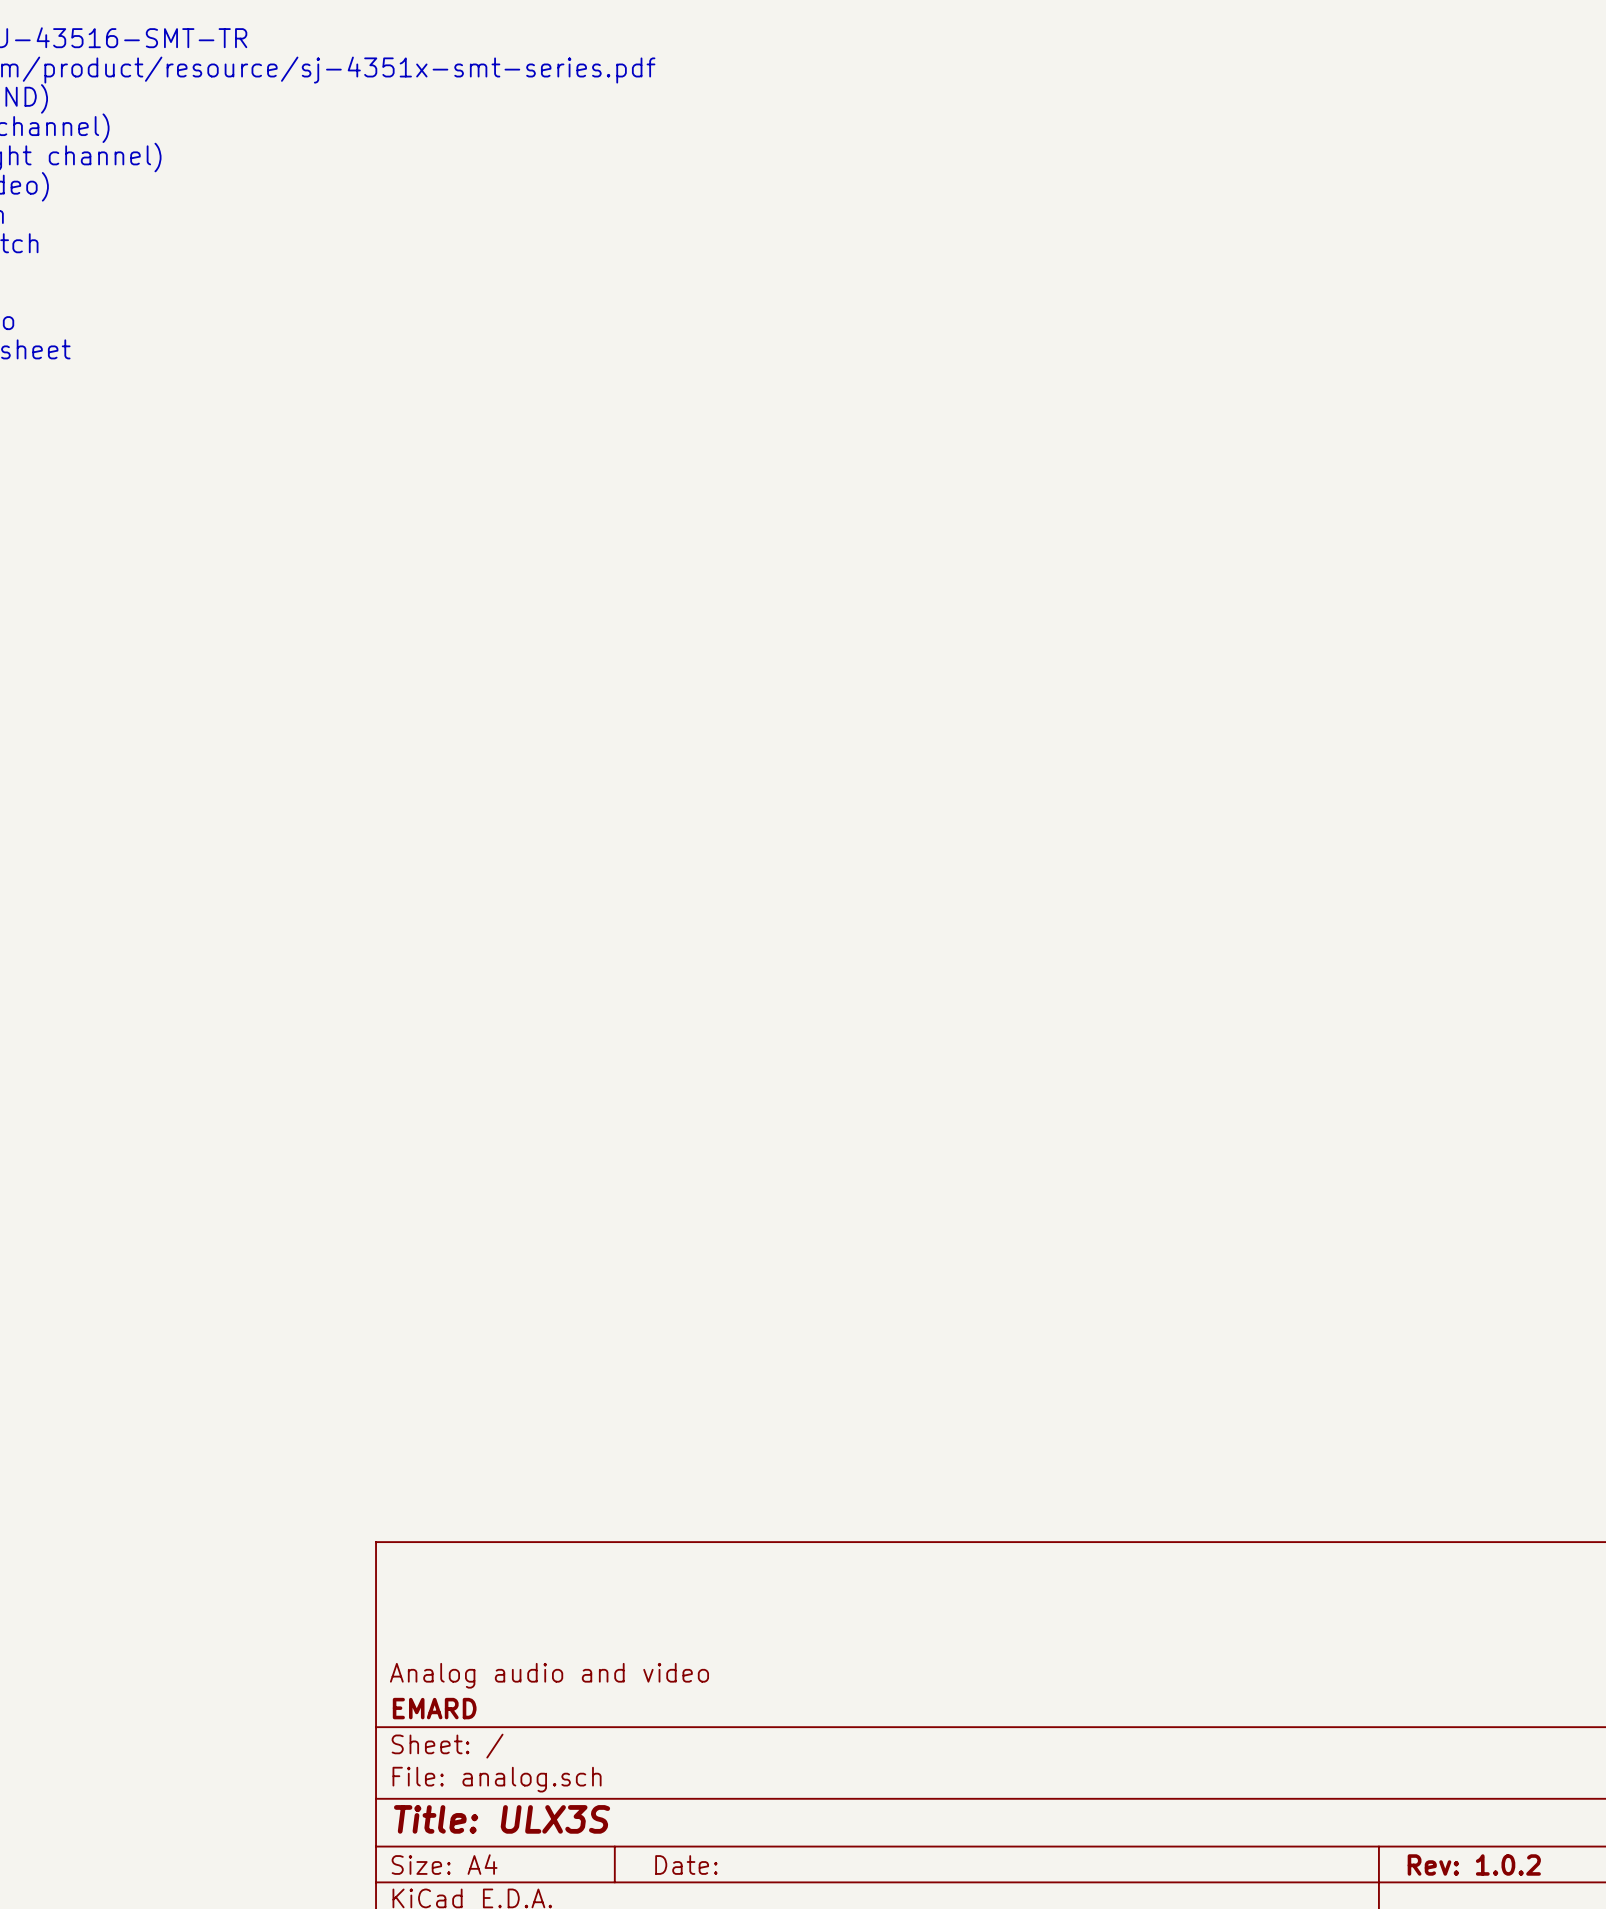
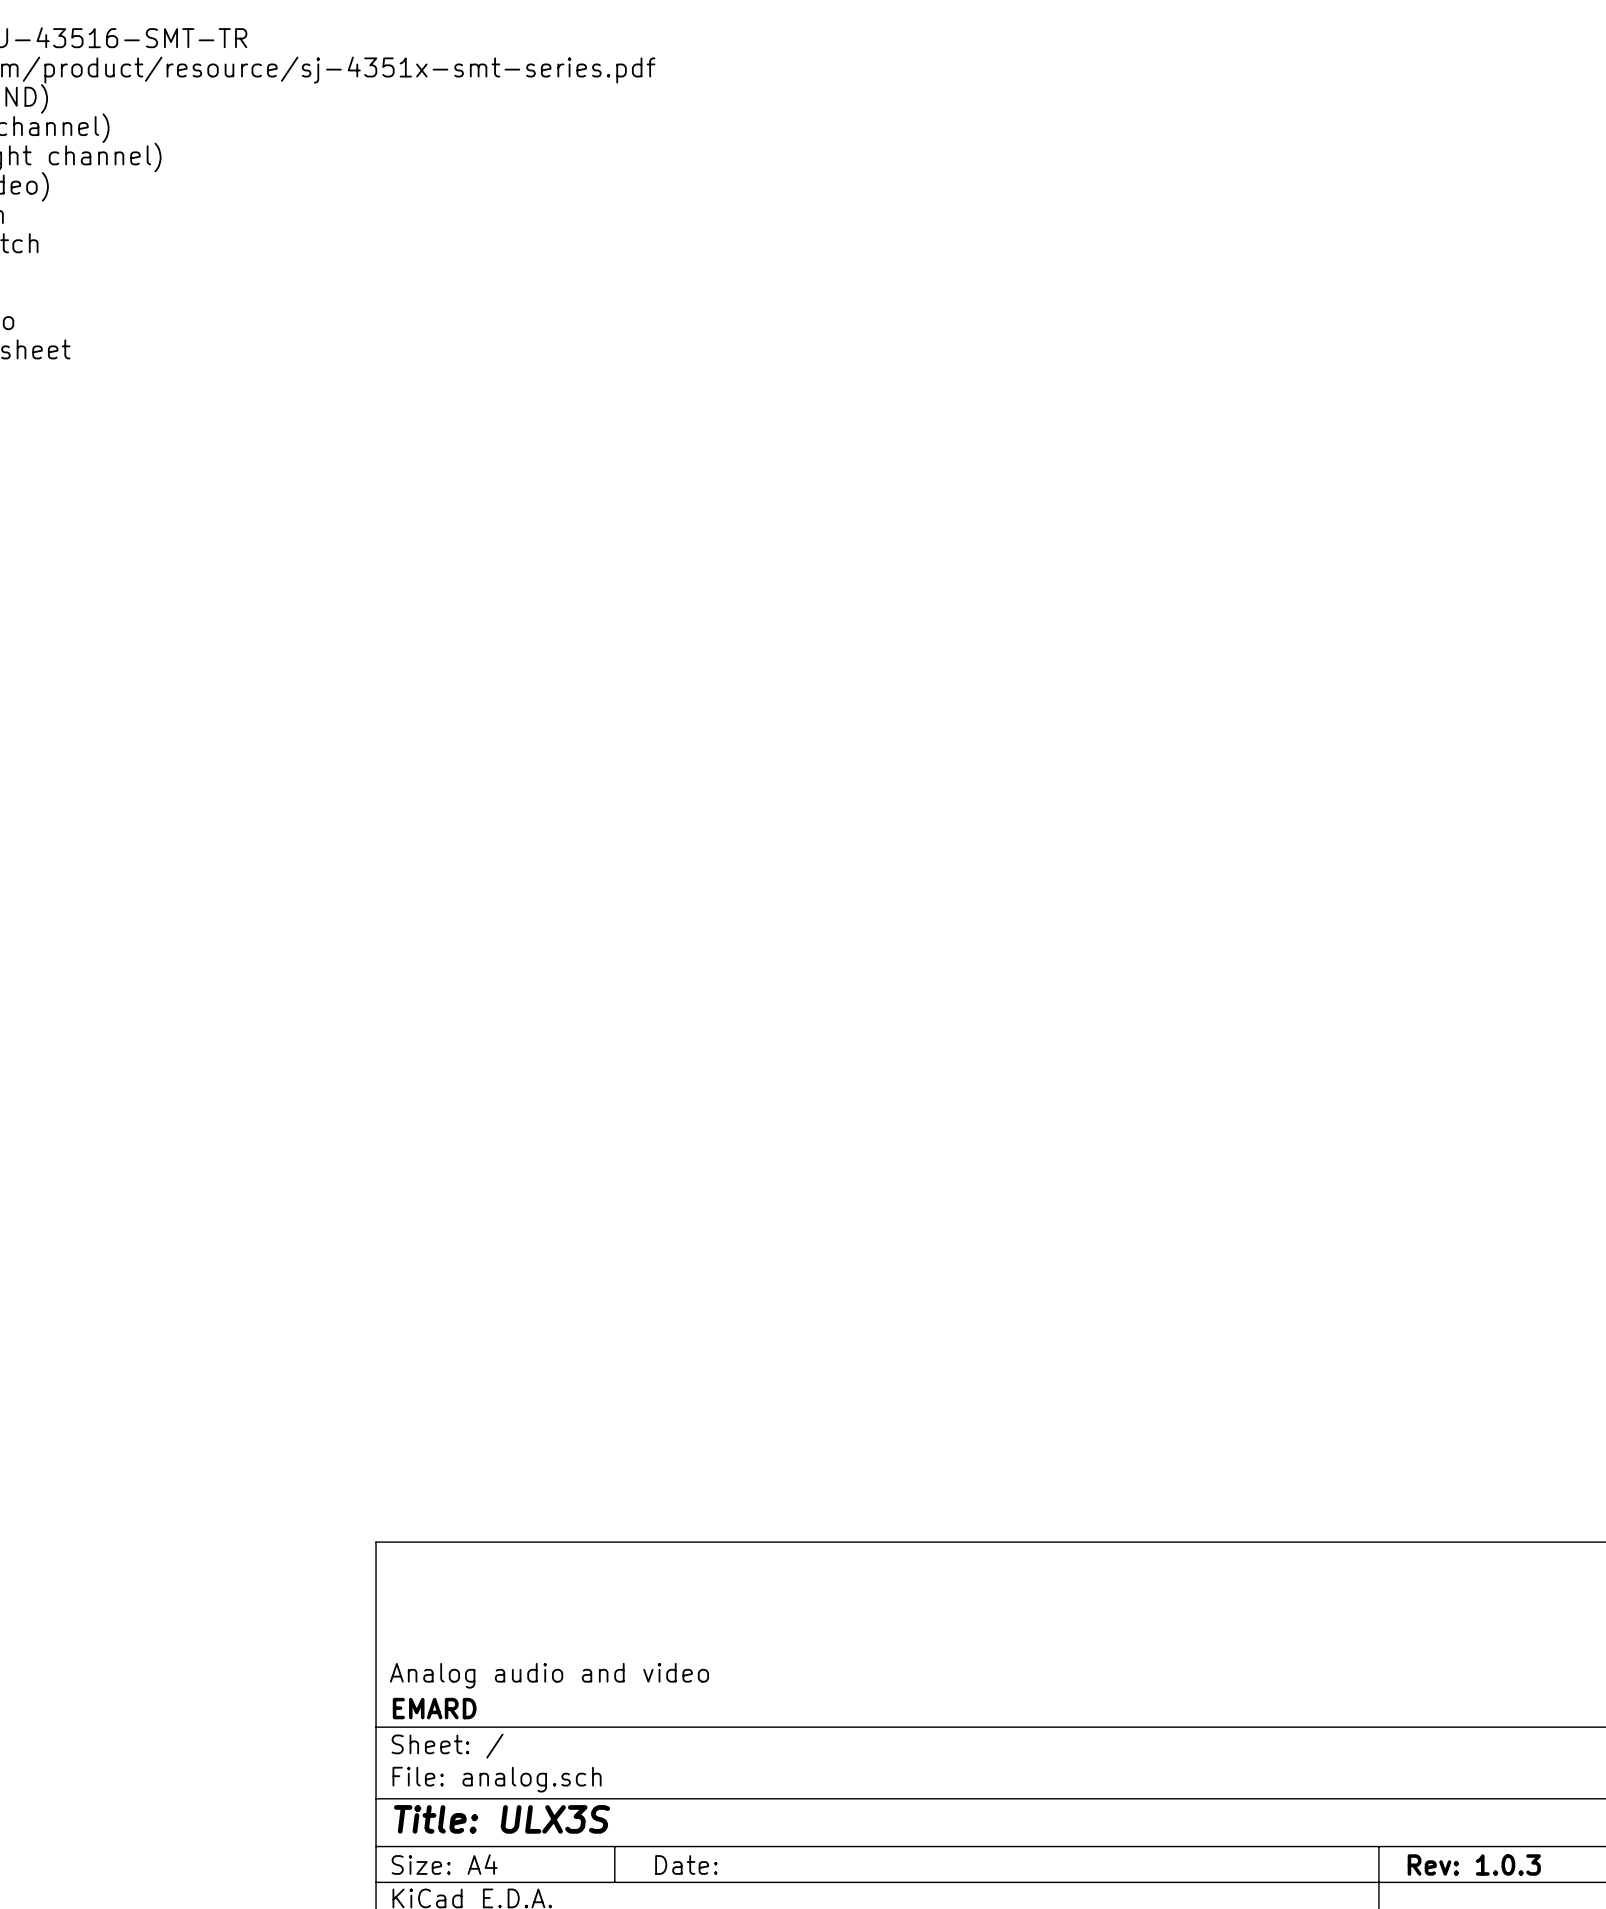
title block: Rev: 1.0.2 (1474, 1864) -> Rev: 1.0.3 (1474, 1864)

